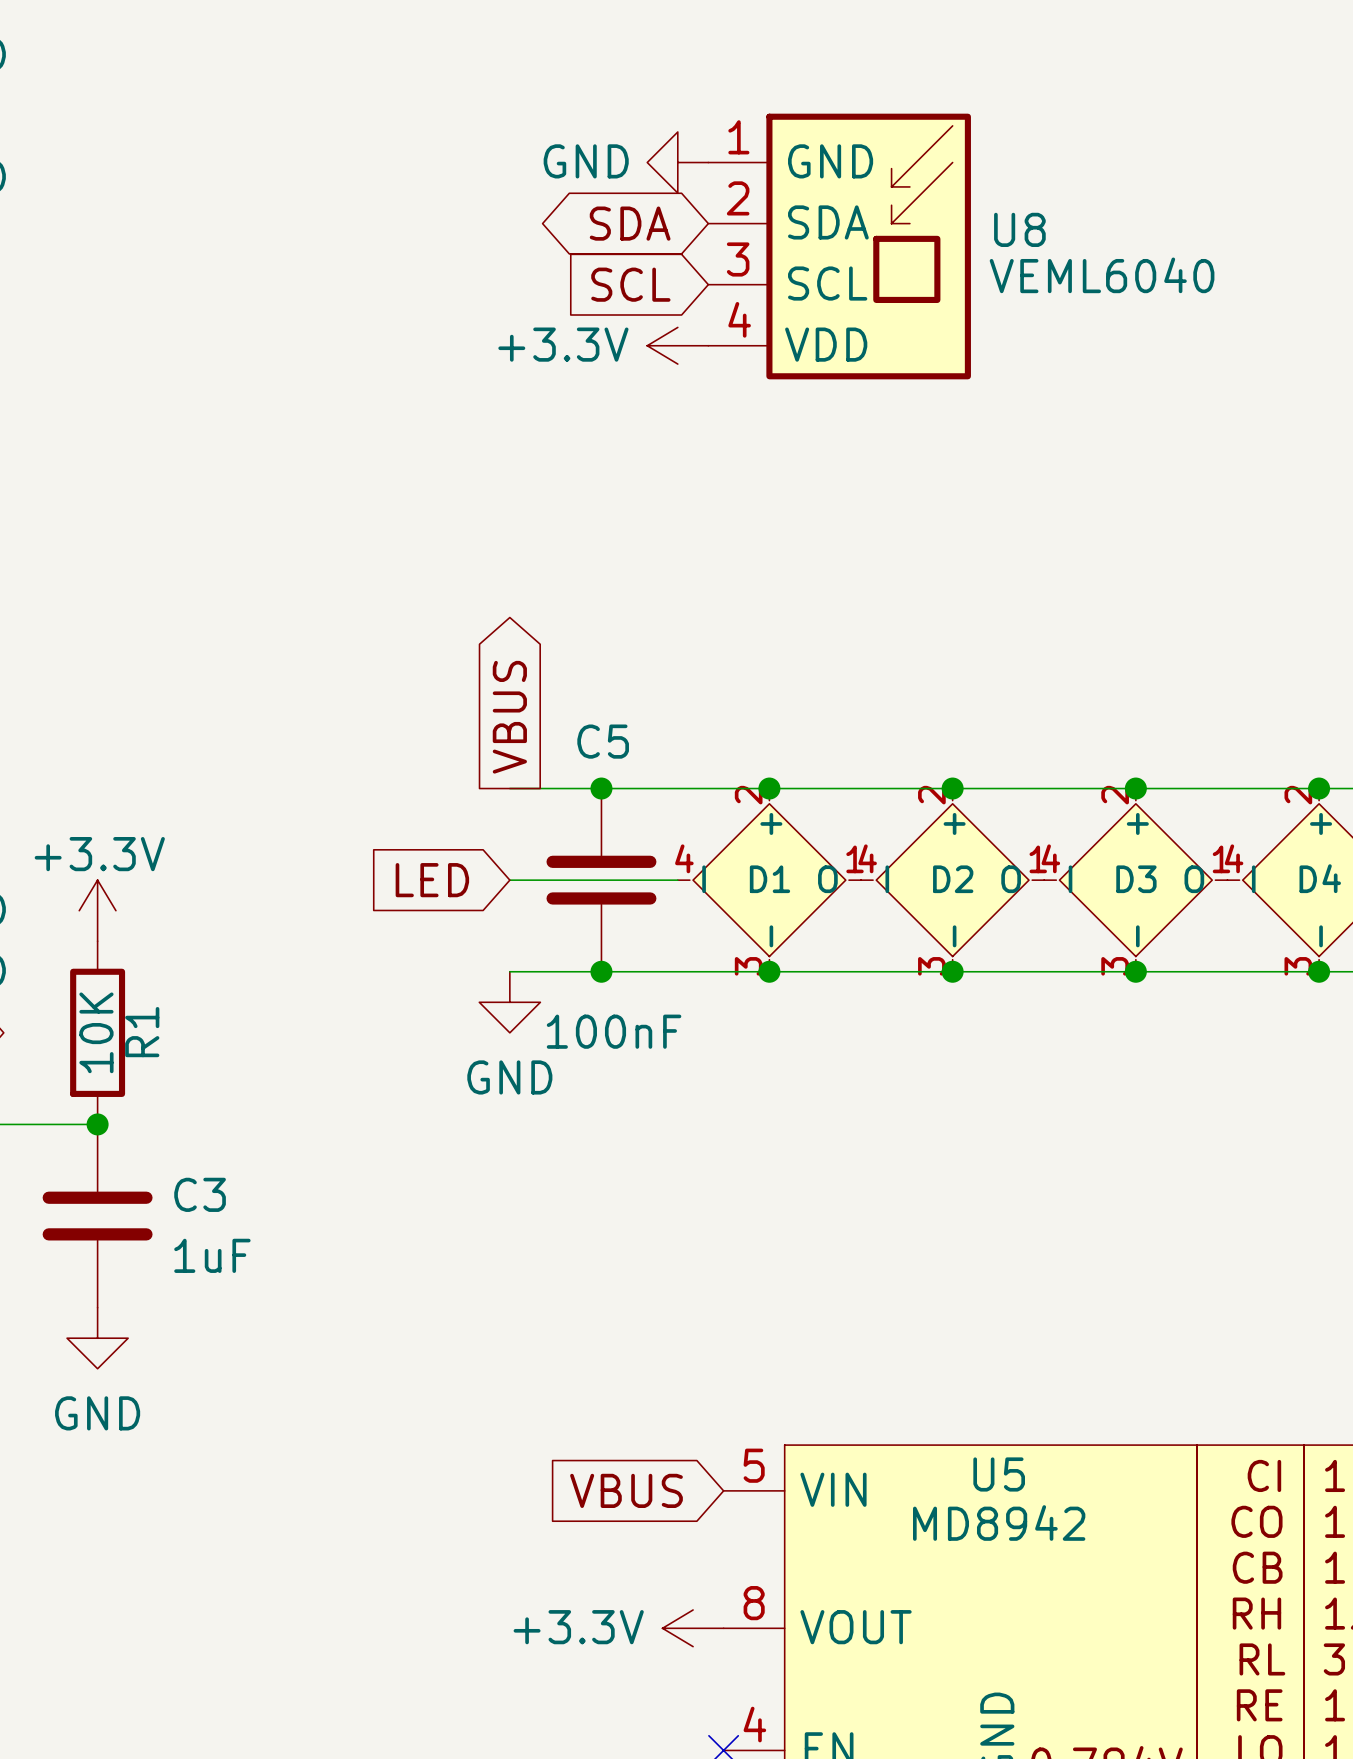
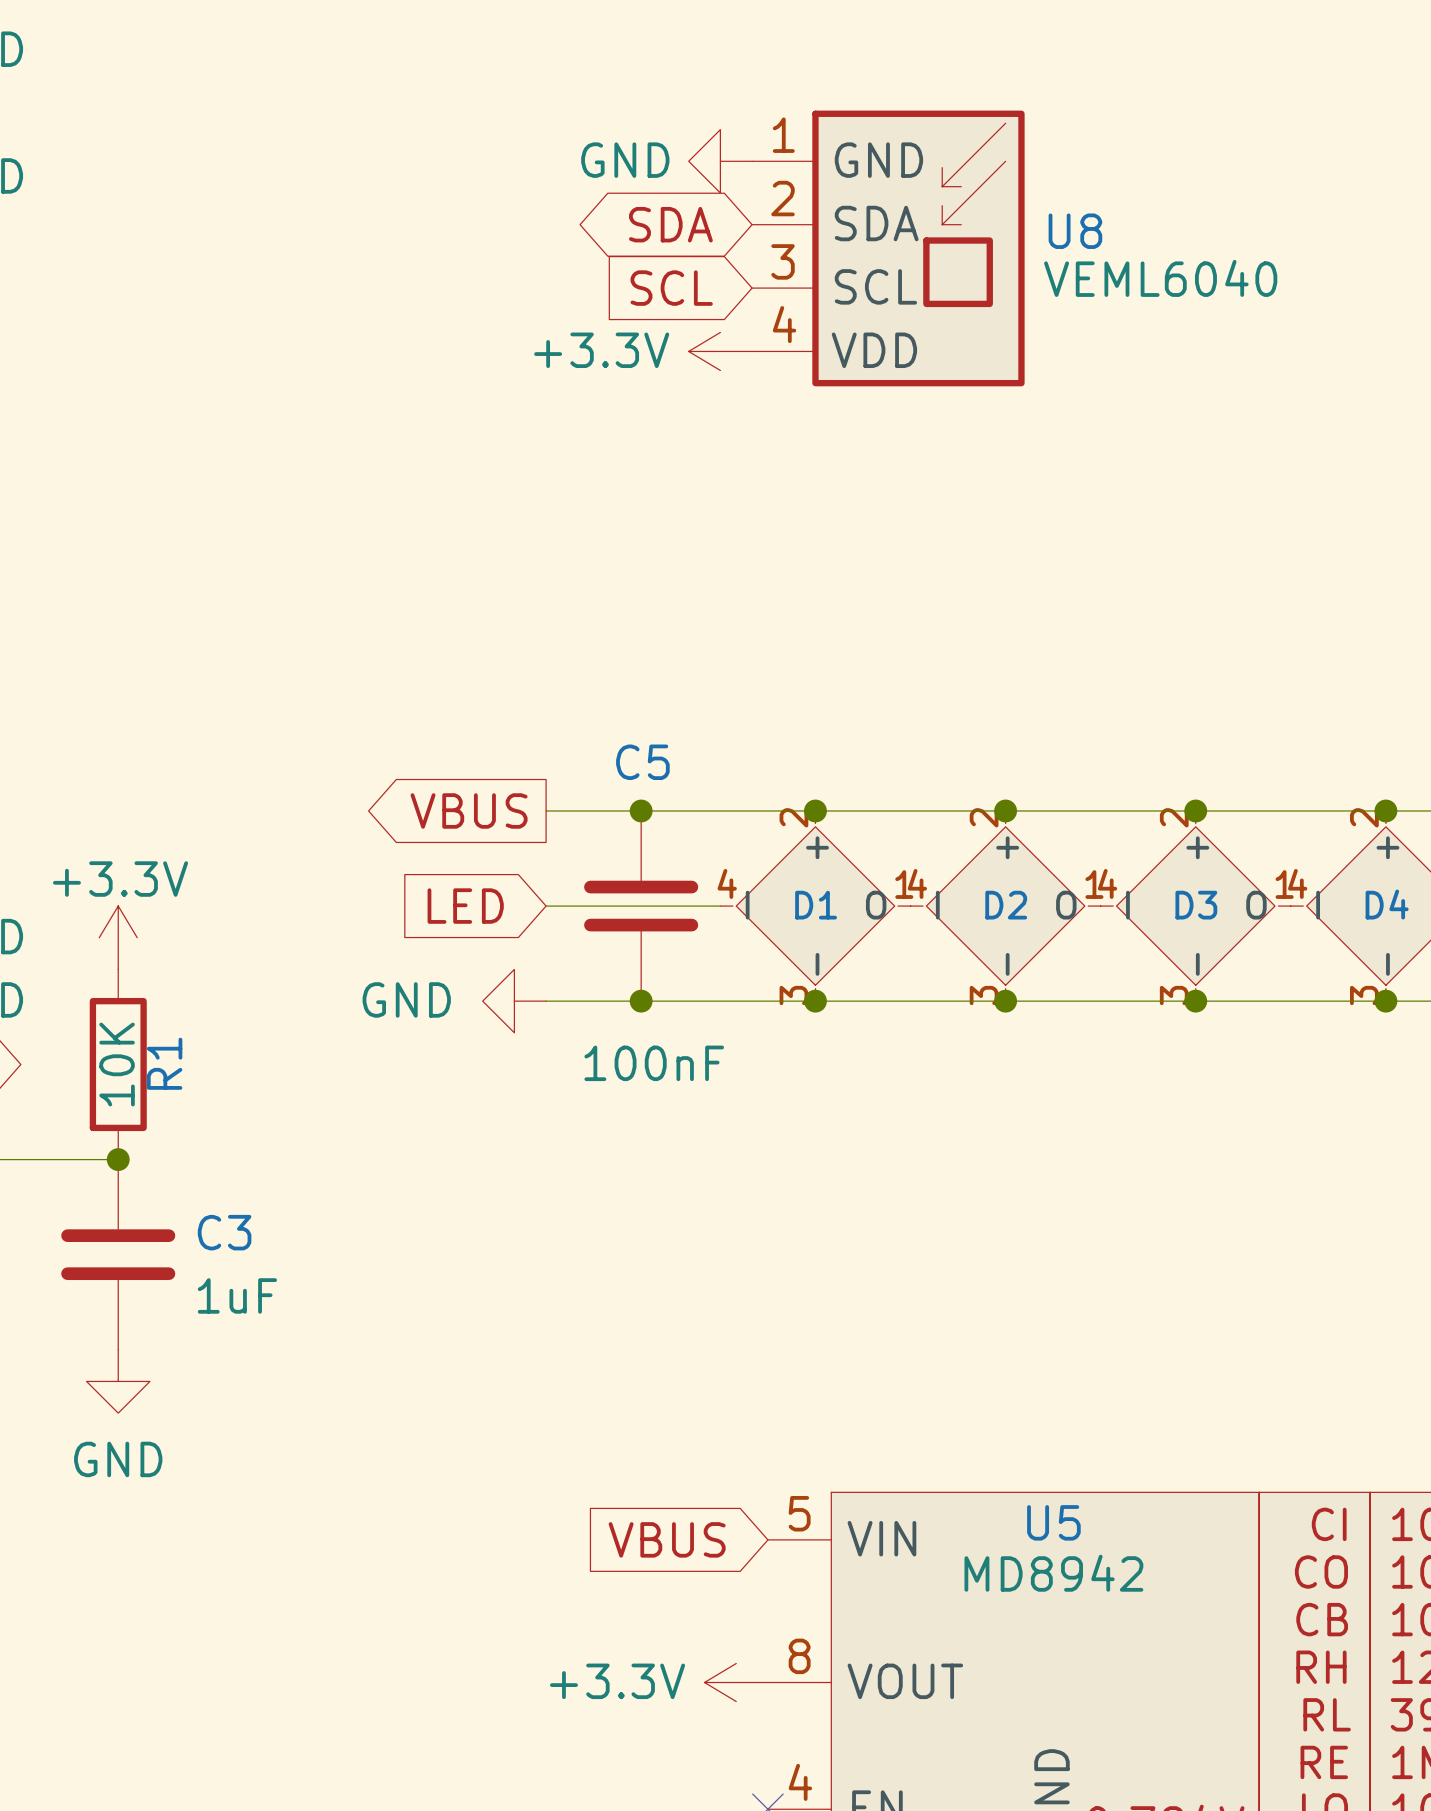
global label rotation: 0° (509, 717) -> 90° counterclockwise (469, 810)
power symbol rotation: 0° (509, 1002) -> 90° clockwise (514, 1001)
power symbol position: GND (509, 1002) -> GND (514, 1001)

